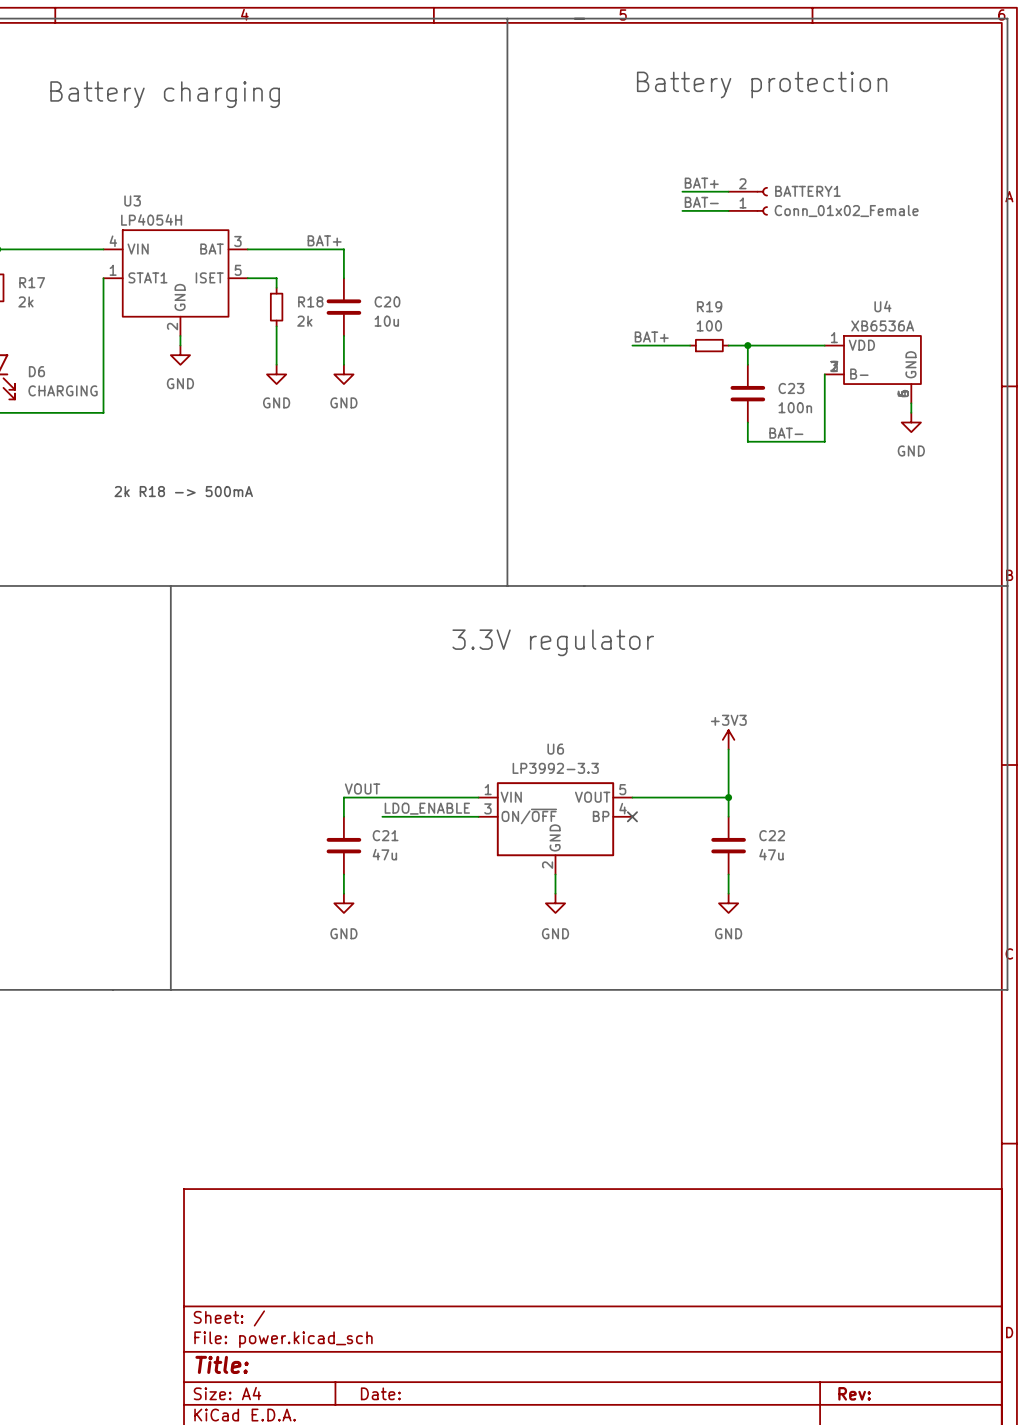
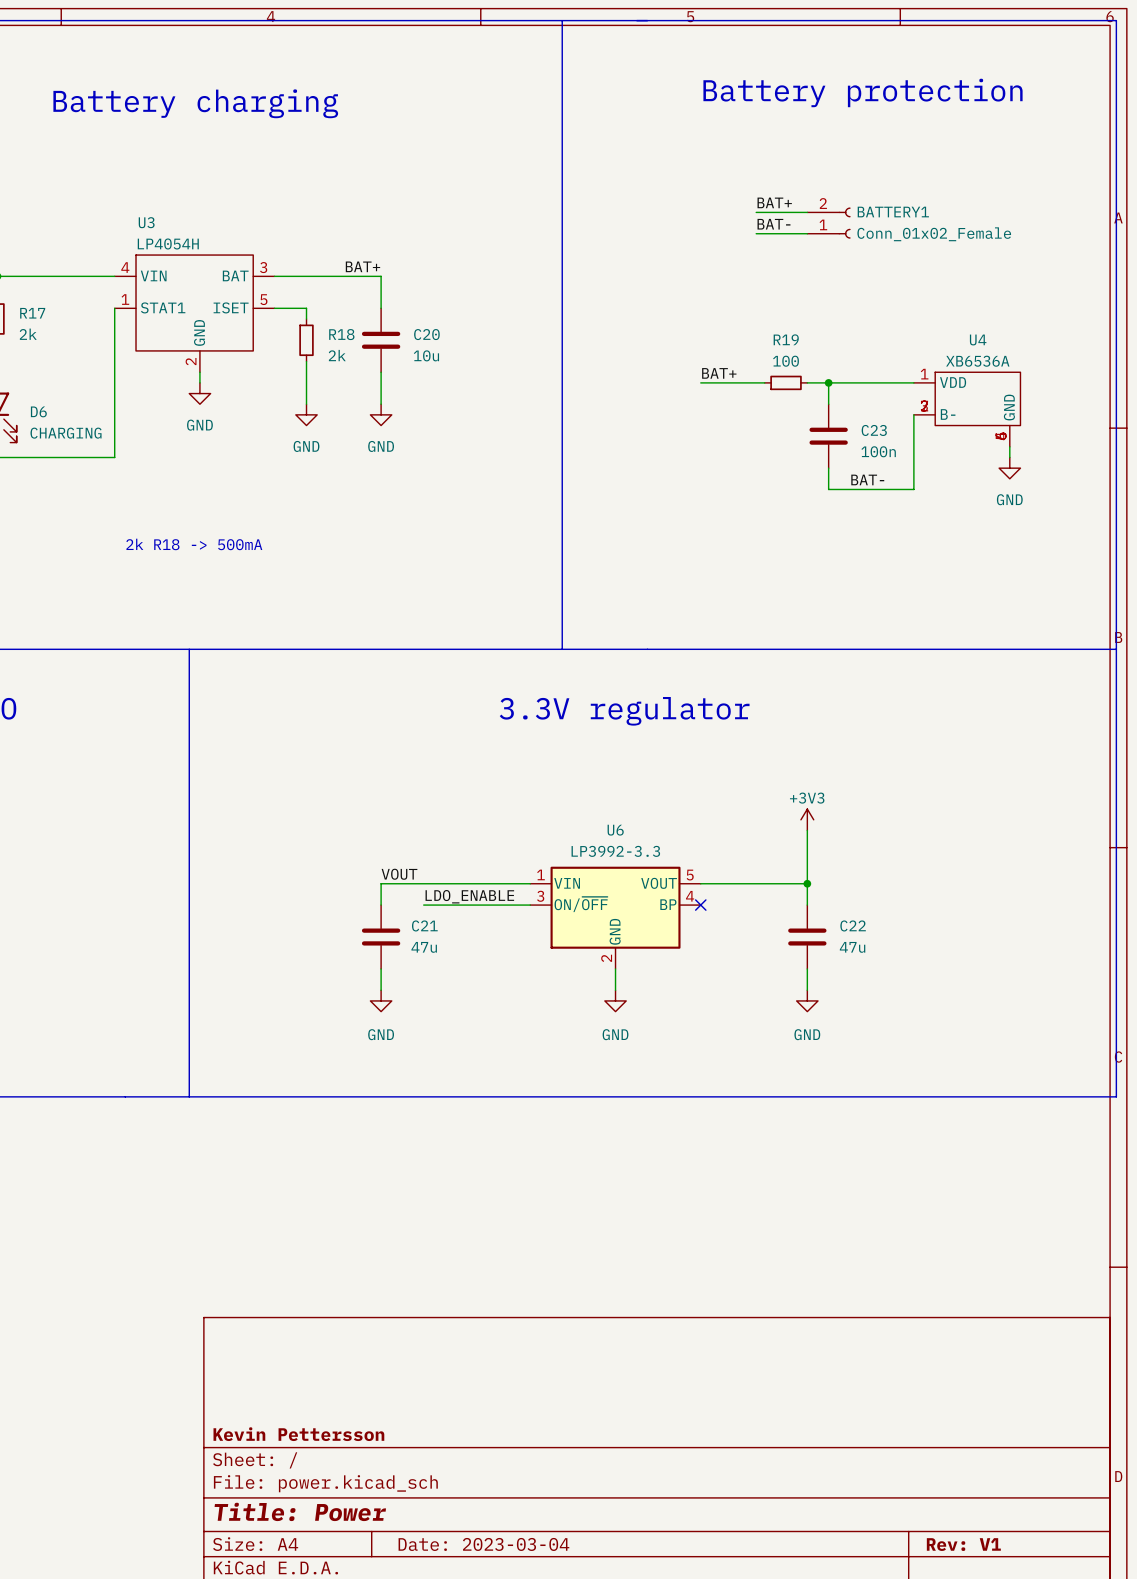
title block: none -> Kevin Pettersson (298, 1434)
title block: Title: (222, 1364) -> Title: Power (300, 1511)
title block: Date: (380, 1393) -> Date: 2023-03-04 (483, 1544)
title block: Rev: (854, 1393) -> Rev: V1 (963, 1544)

